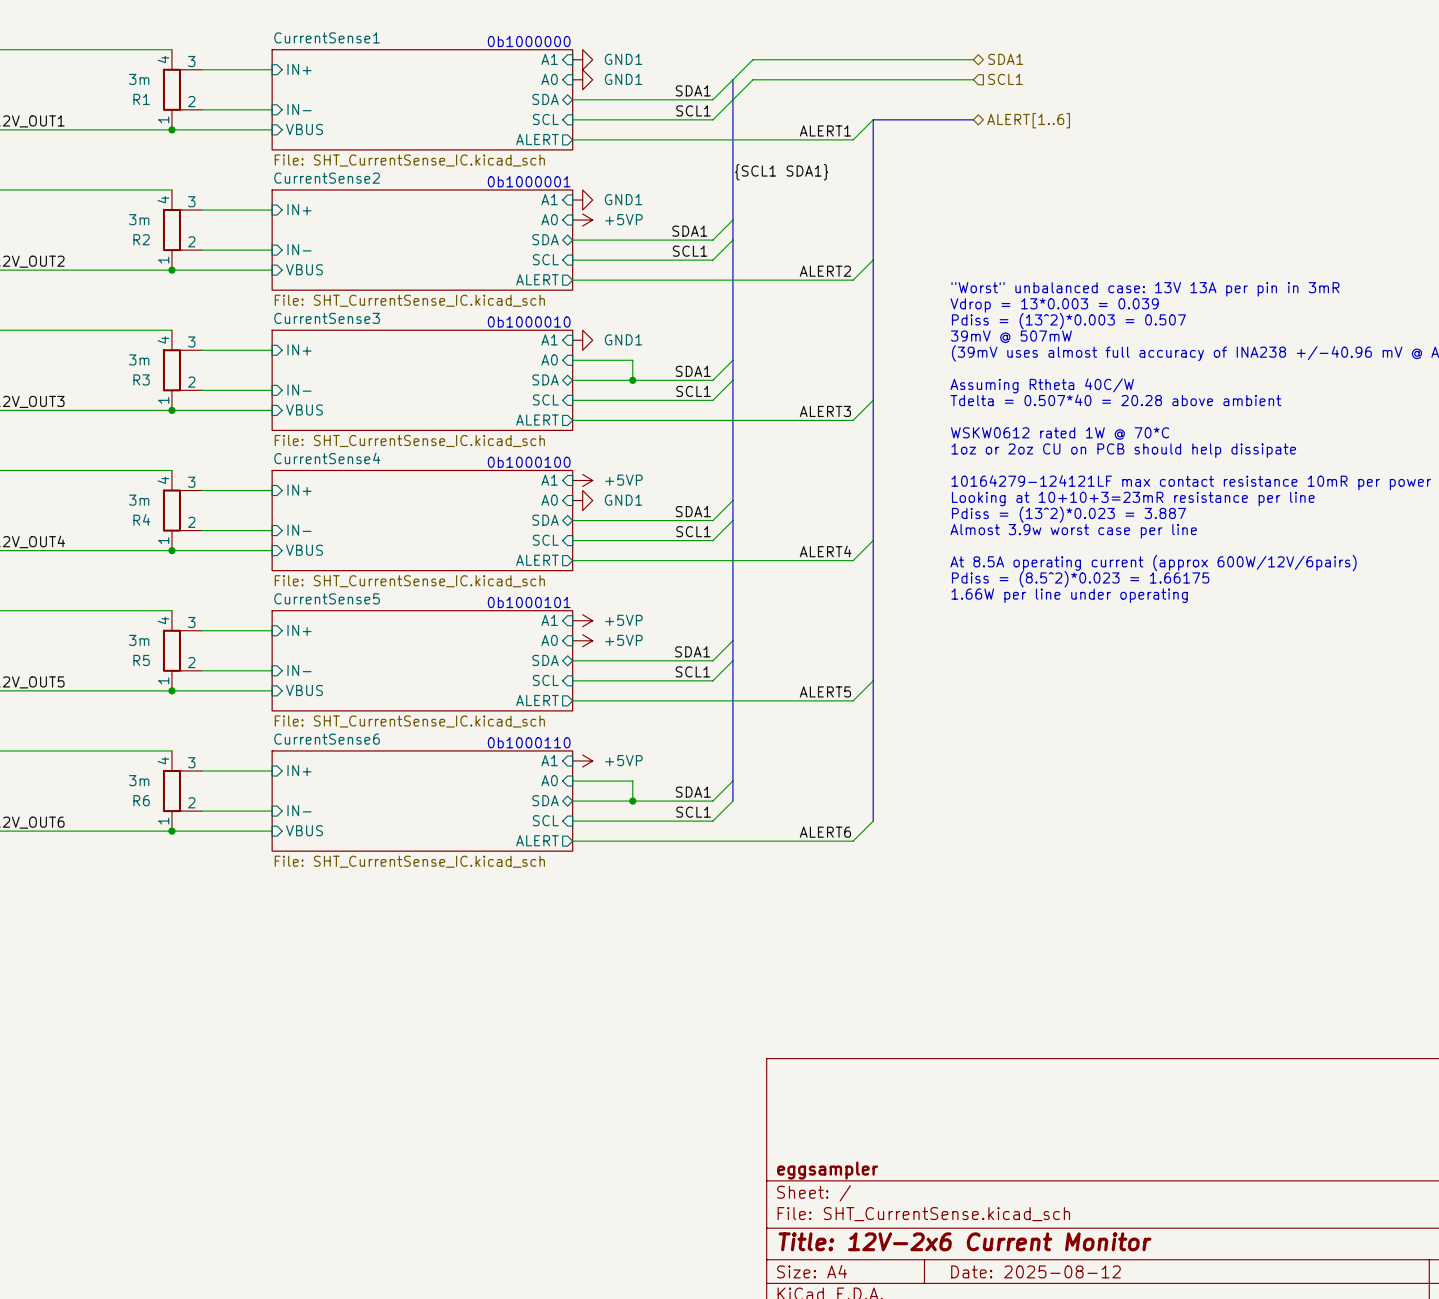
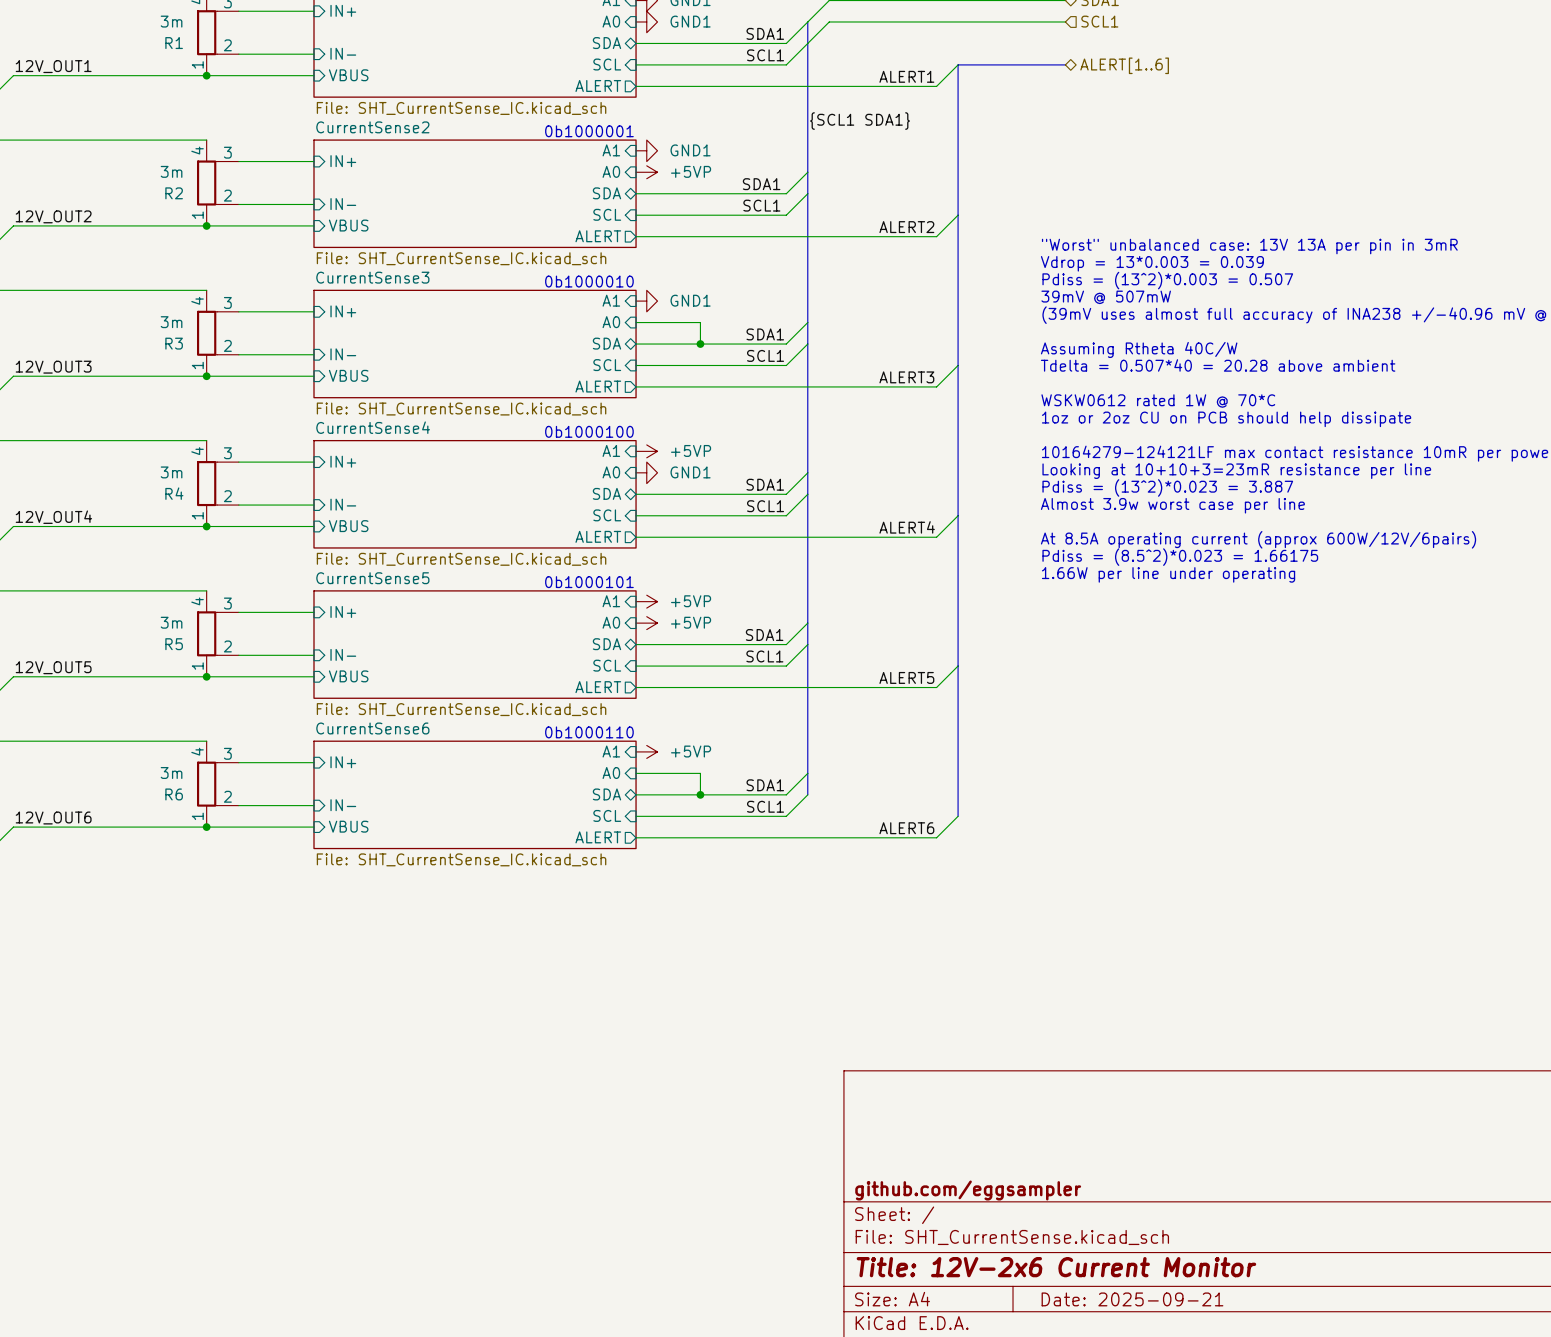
title block: eggsampler (827, 1170) -> github.com/eggsampler (968, 1190)
title block: Date: 2025-08-12 (1035, 1271) -> Date: 2025-09-21 (1132, 1299)

